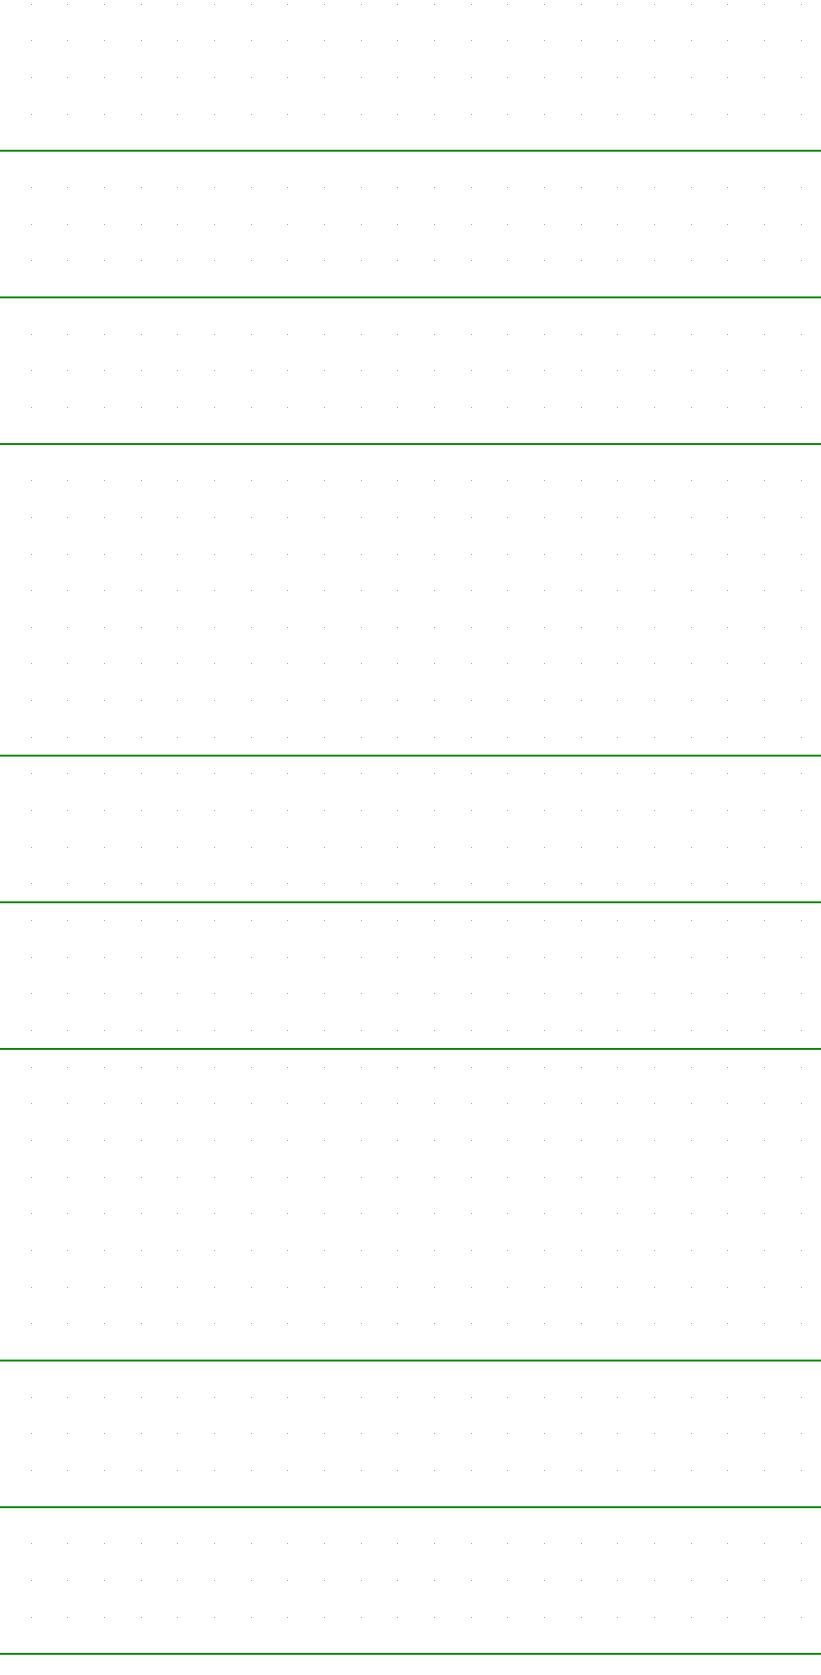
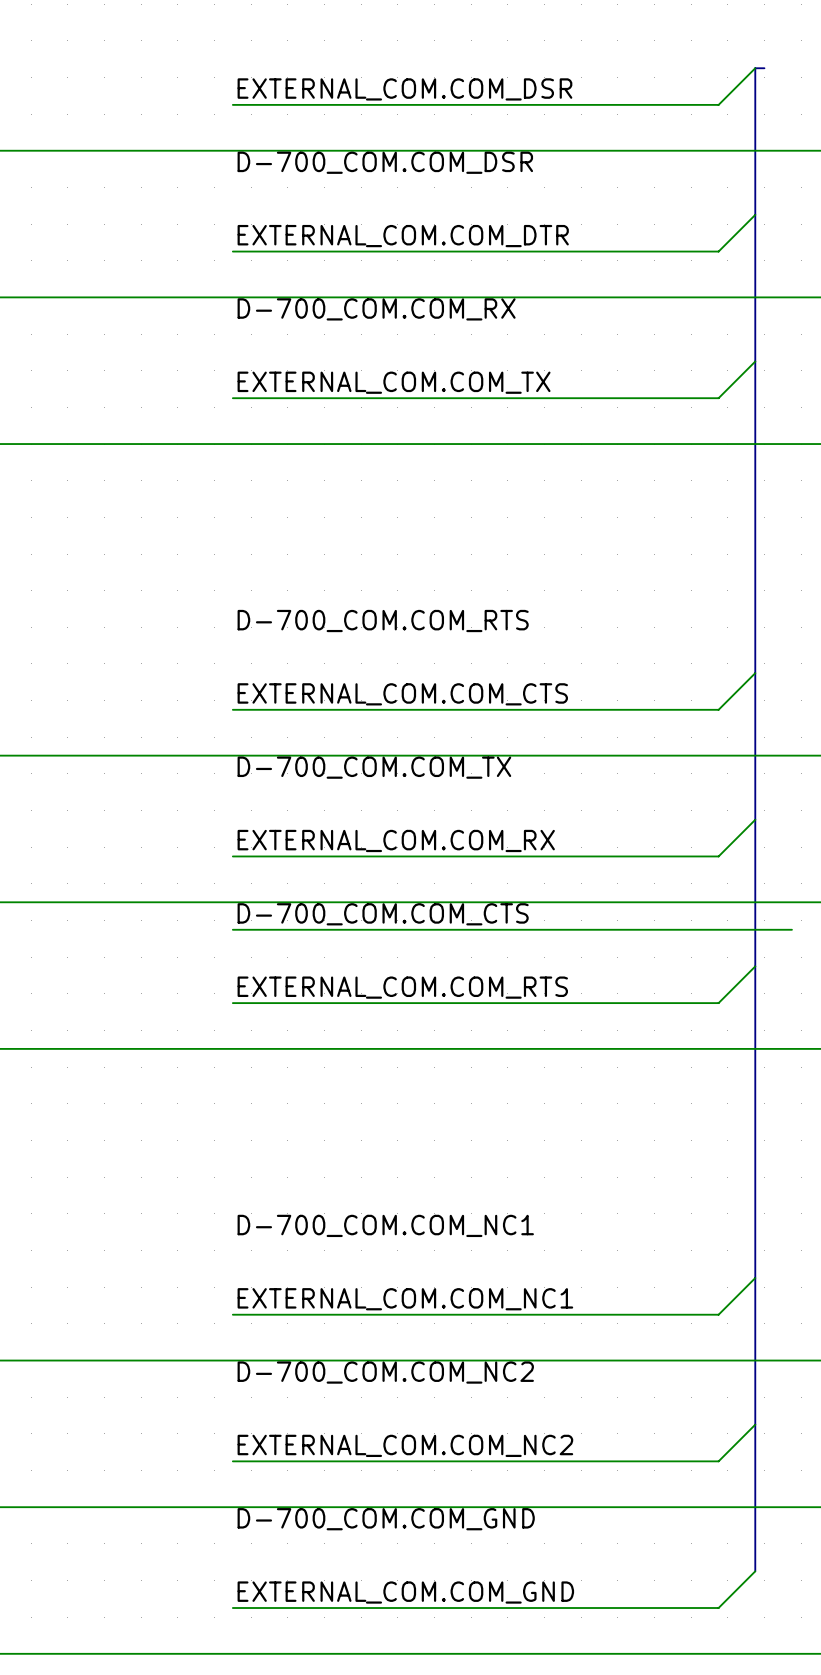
wire: none -> (755, 68) (718, 104)
bus: none -> (764, 68) (755, 68) (755, 1571)
label: none -> EXTERNAL_COM.COM_DSR (404, 89)
wire: none -> (232, 104) (718, 104)
label: none -> D-700_COM.COM_DSR (385, 162)
wire: none -> (755, 214) (718, 251)
label: none -> EXTERNAL_COM.COM_DTR (403, 236)
wire: none -> (232, 251) (718, 251)
label: none -> D-700_COM.COM_RX (376, 309)
wire: none -> (755, 361) (718, 398)
label: none -> EXTERNAL_COM.COM_TX (394, 382)
wire: none -> (232, 398) (718, 398)
label: none -> D-700_COM.COM_RTS (383, 621)
wire: none -> (755, 673) (718, 709)
label: none -> EXTERNAL_COM.COM_CTS (402, 694)
wire: none -> (232, 709) (718, 709)
label: none -> D-700_COM.COM_TX (374, 767)
wire: none -> (755, 819) (718, 856)
label: none -> EXTERNAL_COM.COM_RX (396, 840)
wire: none -> (232, 856) (718, 856)
label: none -> D-700_COM.COM_CTS (383, 914)
wire: none -> (232, 929) (791, 929)
wire: none -> (755, 966) (718, 1003)
label: none -> EXTERNAL_COM.COM_RTS (402, 987)
wire: none -> (232, 1003) (718, 1003)
label: none -> D-700_COM.COM_NC1 (385, 1225)
wire: none -> (755, 1278) (718, 1314)
label: none -> EXTERNAL_COM.COM_NC1 (405, 1299)
wire: none -> (232, 1314) (718, 1314)
label: none -> D-700_COM.COM_NC2 (385, 1372)
wire: none -> (755, 1424) (718, 1461)
label: none -> EXTERNAL_COM.COM_NC2 (405, 1445)
wire: none -> (232, 1461) (718, 1461)
label: none -> D-700_COM.COM_GND (386, 1519)
wire: none -> (755, 1571) (718, 1608)
label: none -> EXTERNAL_COM.COM_GND (405, 1592)
wire: none -> (232, 1608) (718, 1608)

